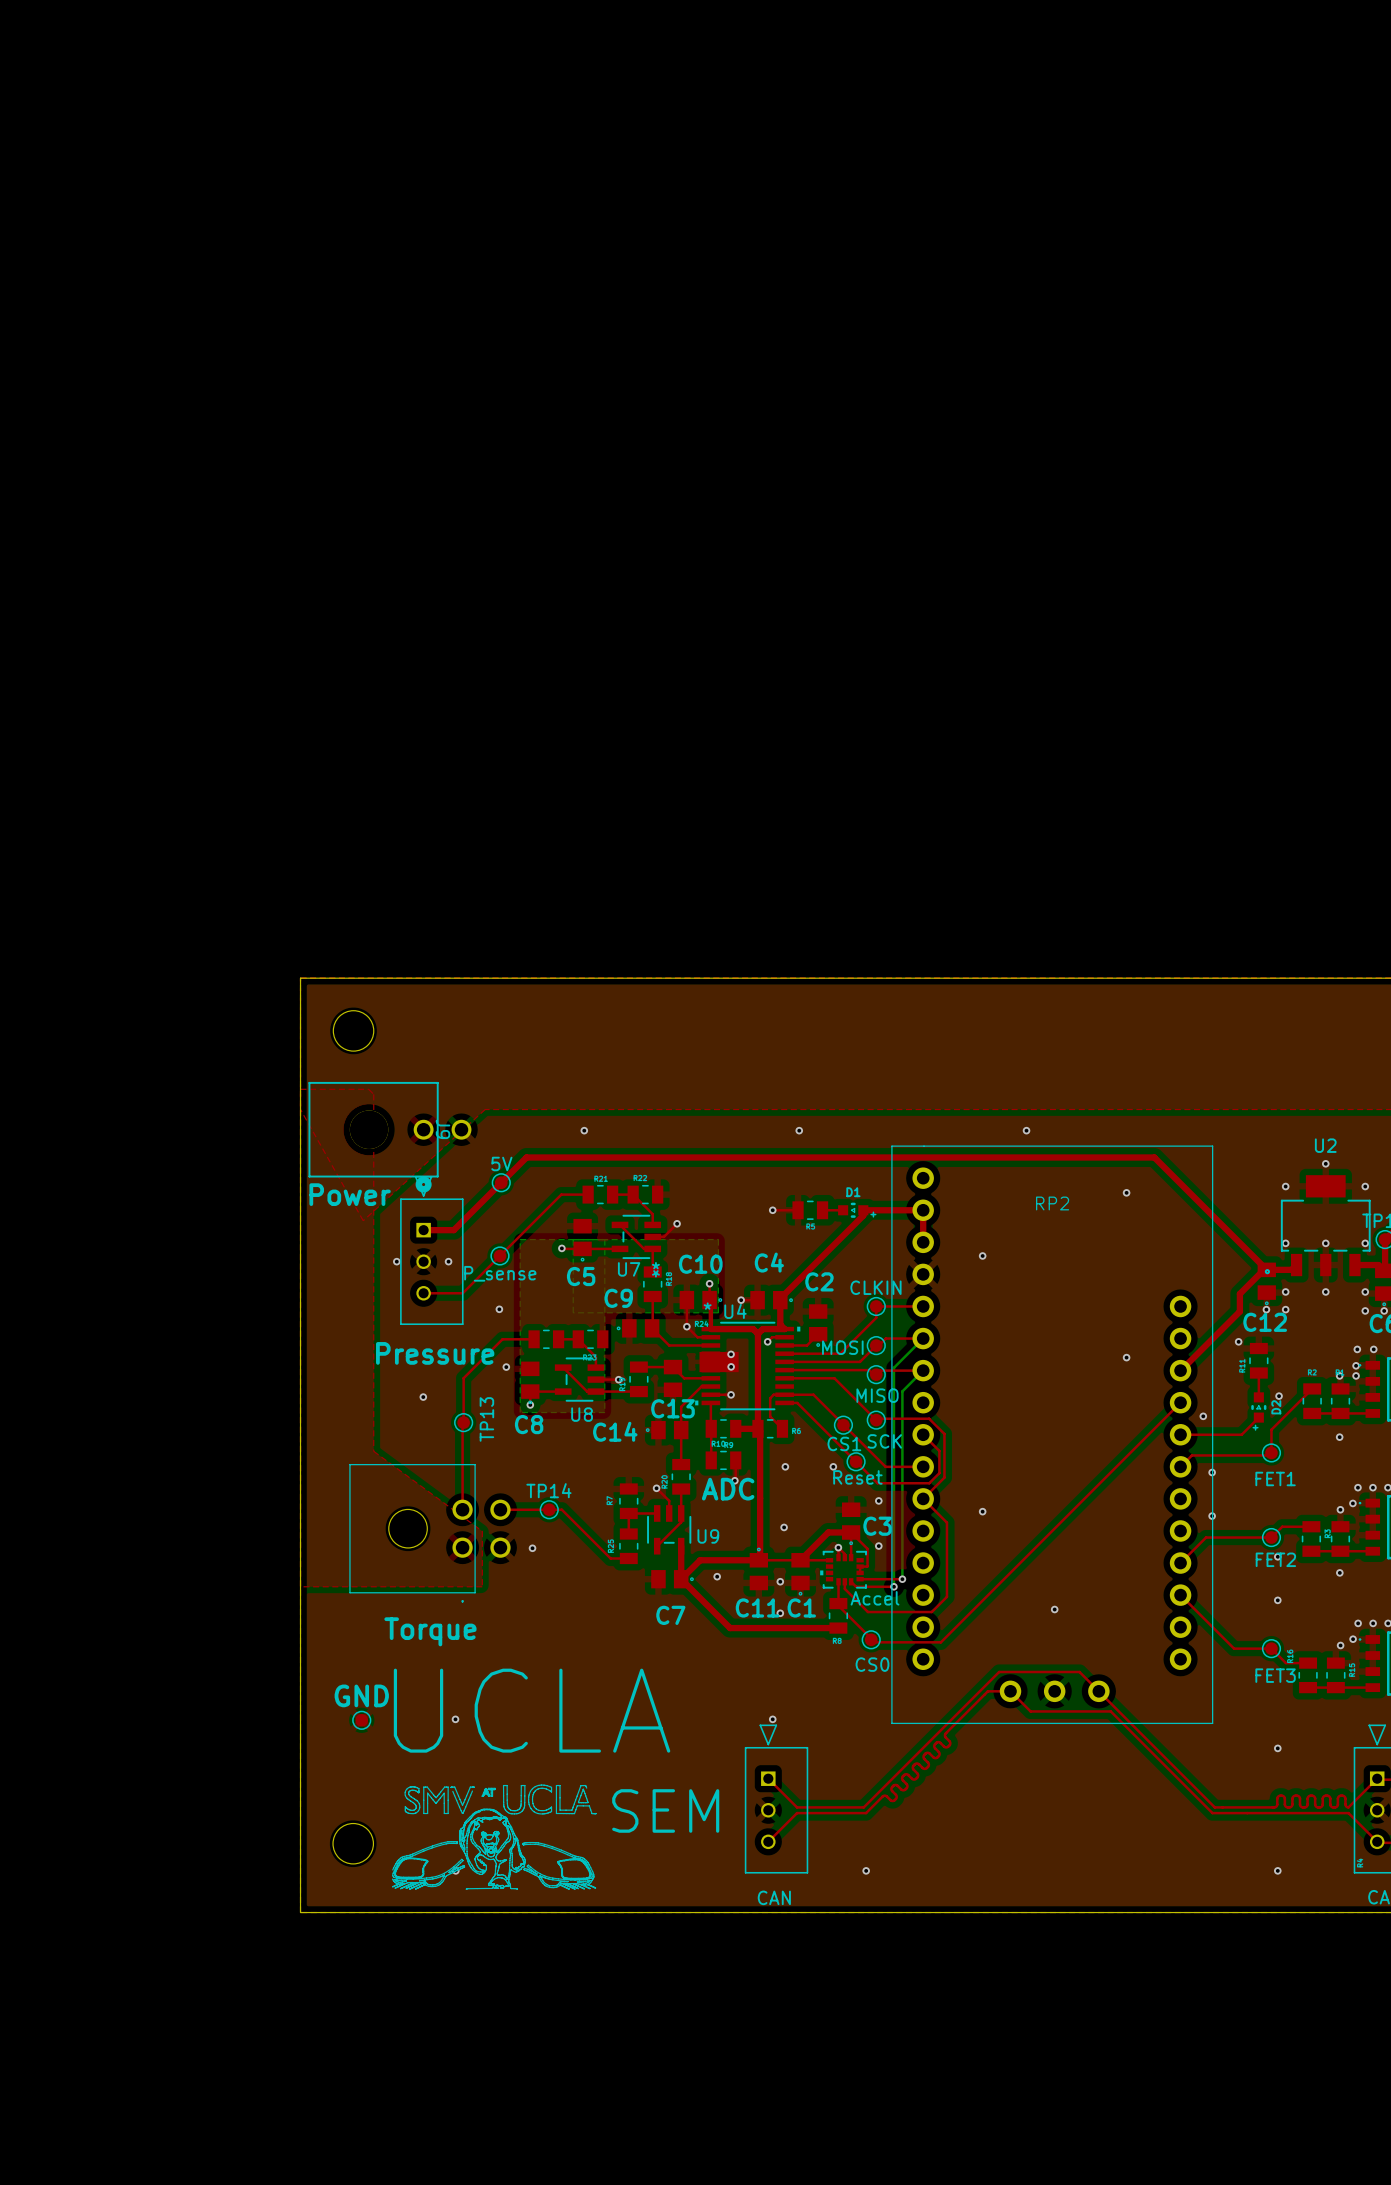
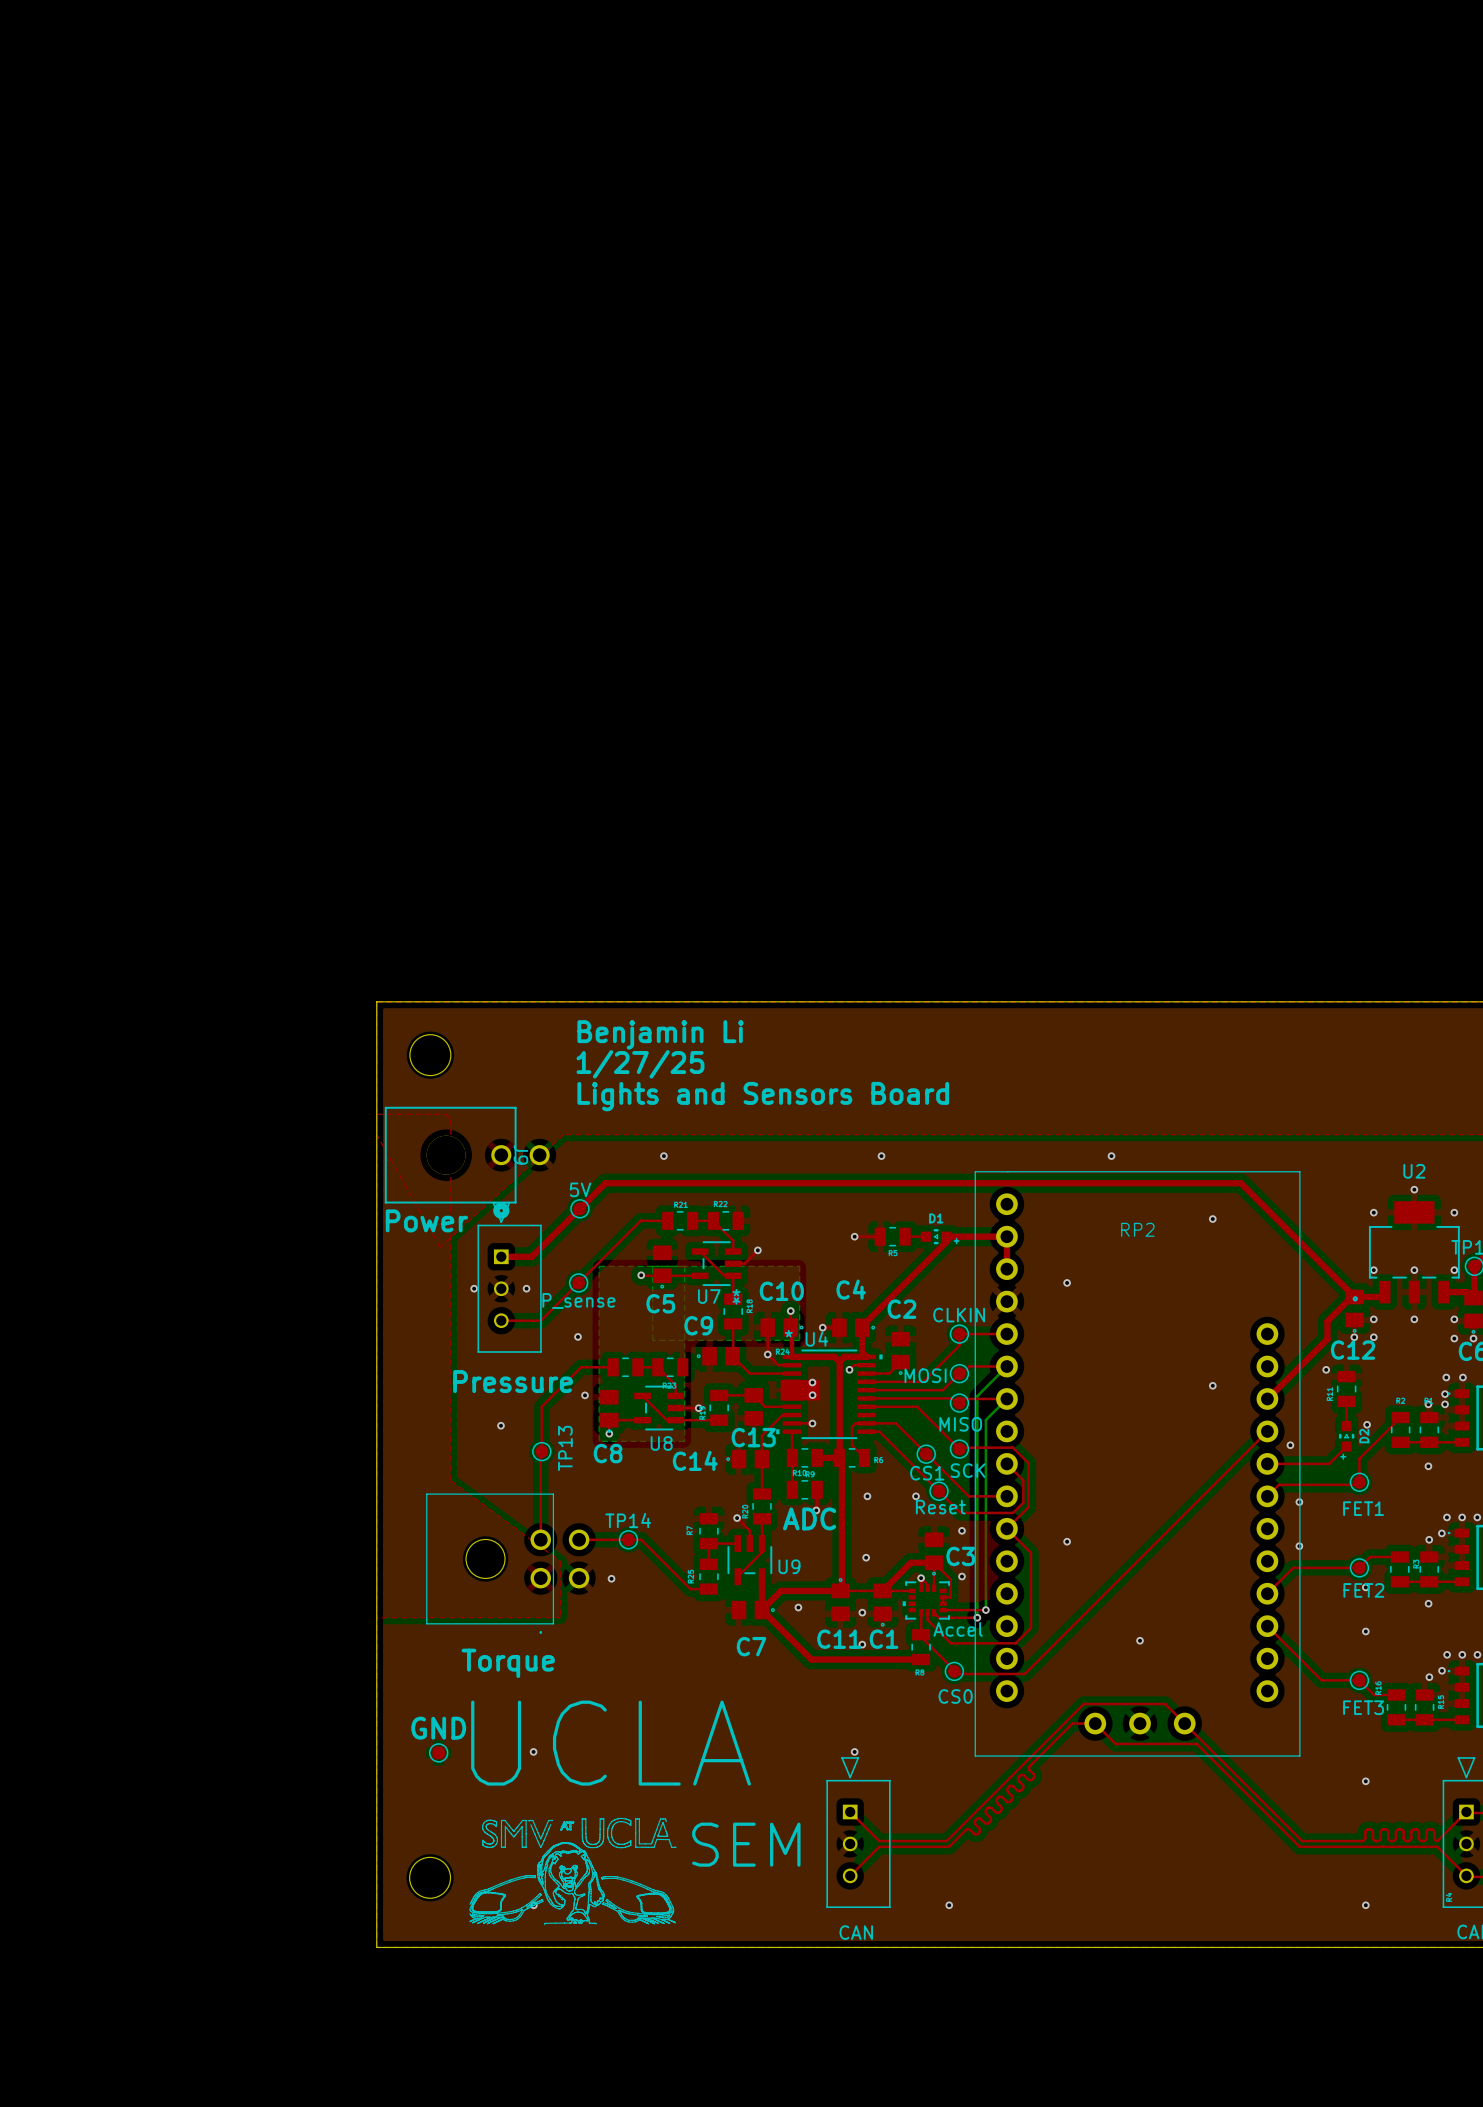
text: none -> Benjamin Li (660, 1034)
text: none -> 1/27/25 (640, 1064)
text: none -> Lights and Sensors Board (763, 1096)

